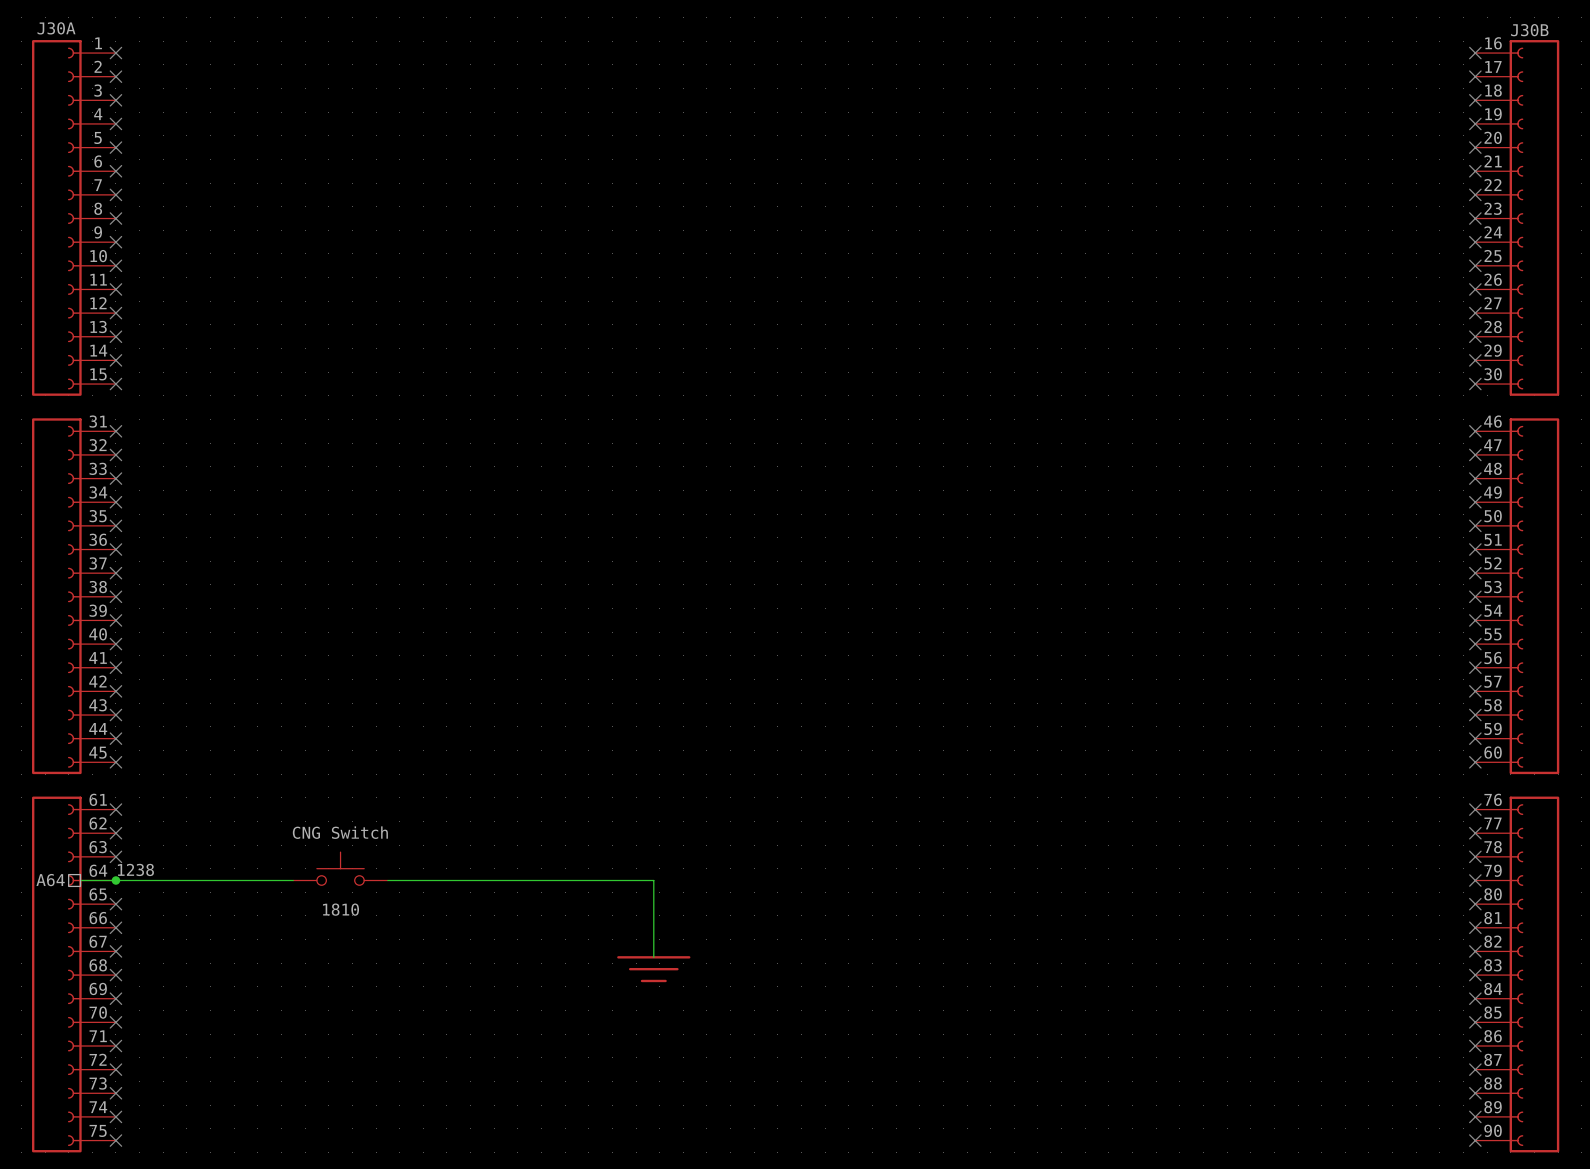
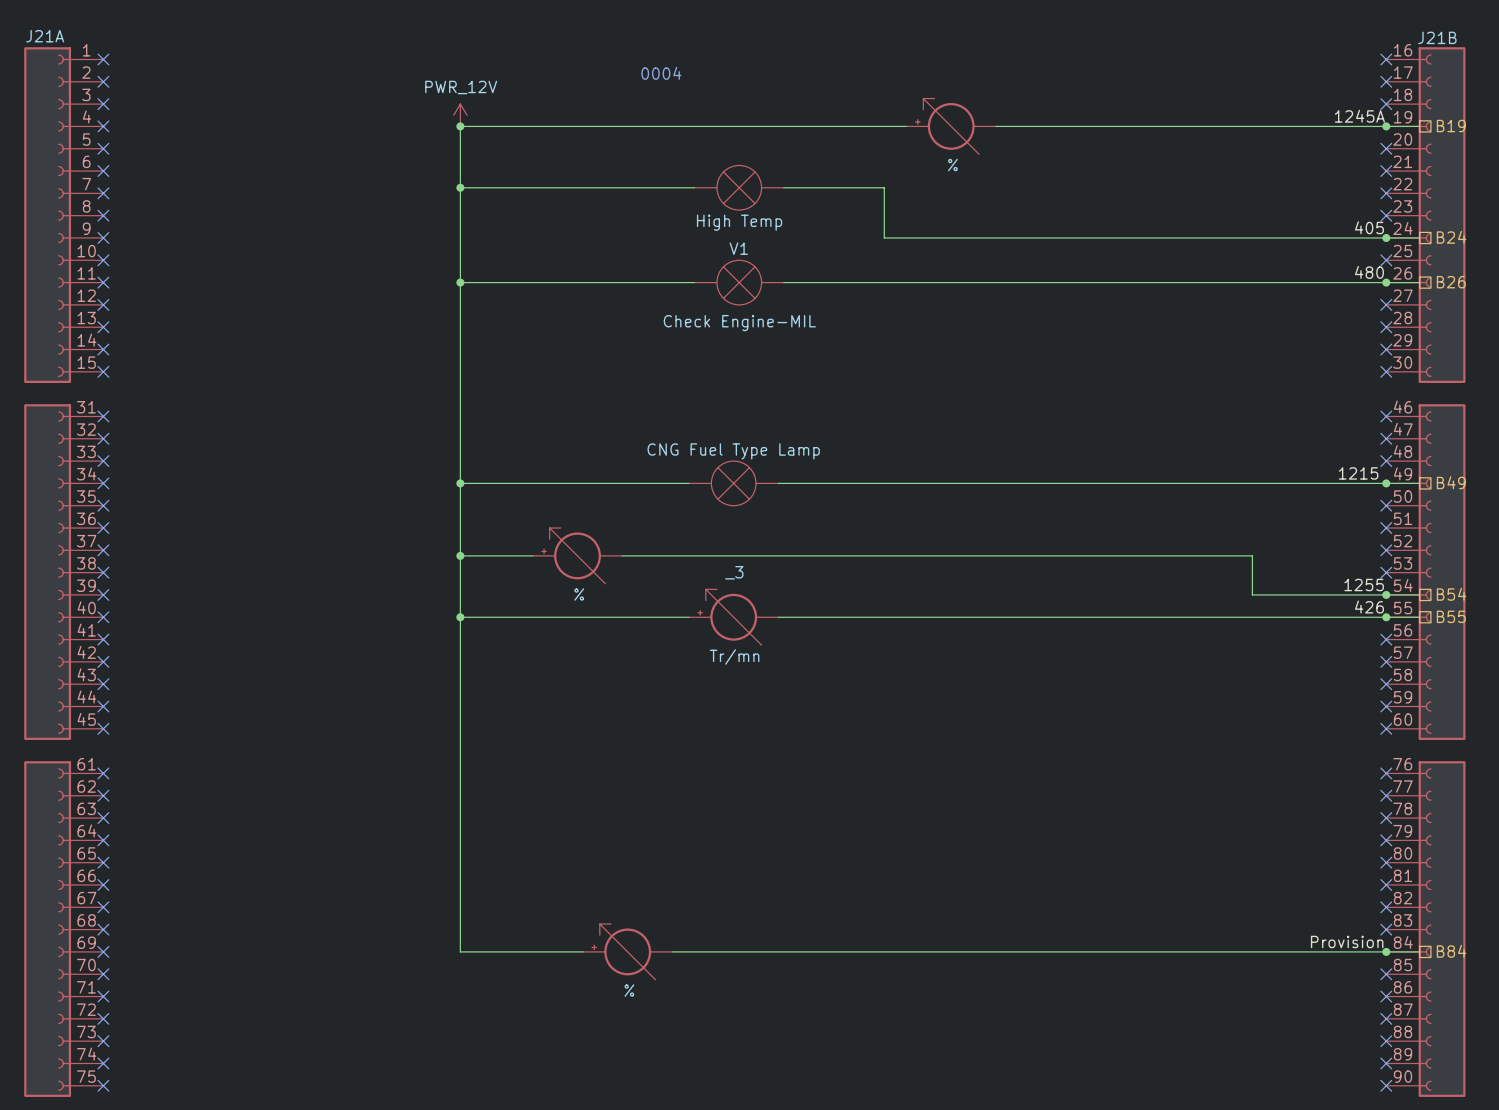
J30A name: J30A (56, 28) -> J21A (45, 36)
J30B name: J30B (1529, 30) -> J21B (1437, 37)
text: none -> 0004 (661, 73)
power symbol: none -> PWR_12V (460, 115)
label: none -> 1245A (1359, 116)
junction: none -> (460, 126)
wire: none -> (906, 126) (460, 126) (460, 951) (583, 951)
part: none -> % (951, 126)
wire: none -> (995, 126) (1419, 126)
junction: none -> (1386, 126)
no-connect mark: (1475, 123) -> none
hierarchical label: none -> B19 (1451, 126)
wire: none -> (460, 187) (694, 187)
junction: none -> (460, 187)
part: none -> High Temp (739, 187)
wire: none -> (783, 187) (884, 187) (884, 237) (1419, 237)
label: none -> 405 (1369, 227)
hierarchical label: none -> B24 (1451, 237)
junction: none -> (1386, 237)
no-connect mark: (1475, 242) -> none
label: none -> 480 (1369, 272)
wire: none -> (460, 282) (694, 282)
junction: none -> (460, 282)
V1: none -> Check Engine-MIL (739, 282)
wire: none -> (783, 282) (1419, 282)
junction: none -> (1386, 282)
no-connect mark: (1475, 289) -> none
hierarchical label: none -> B26 (1451, 282)
label: none -> 1215 (1358, 473)
hierarchical label: none -> B49 (1451, 482)
wire: none -> (460, 483) (689, 483)
junction: none -> (460, 483)
part: none -> CNG Fuel Type Lamp (733, 483)
wire: none -> (778, 483) (1419, 483)
junction: none -> (1386, 483)
no-connect mark: (1475, 502) -> none
wire: none -> (460, 555) (532, 555)
junction: none -> (460, 555)
part: none -> % (577, 555)
wire: none -> (622, 555) (1252, 555) (1252, 594) (1419, 594)
label: none -> 1255 (1364, 585)
junction: none -> (1386, 594)
no-connect mark: (1475, 620) -> none
hierarchical label: none -> B54 (1451, 594)
label: none -> 426 (1369, 607)
hierarchical label: none -> B55 (1451, 616)
wire: none -> (460, 617) (689, 617)
junction: none -> (460, 617)
_3: none -> Tr/mn (733, 617)
wire: none -> (778, 617) (1419, 617)
junction: none -> (1386, 617)
no-connect mark: (1475, 644) -> none
part: CNG Switch (340, 868) -> none
label: 1238 (135, 869) -> none
hierarchical label: A64 (50, 880) -> none
wire: (80, 880) (293, 880) -> none
junction: (115, 880) -> none
no-connect mark: none -> (103, 840)
wire: (387, 880) (653, 880) (653, 957) -> none
power symbol: (653, 969) -> none
label: none -> Provision (1347, 941)
part: none -> % (627, 951)
wire: none -> (672, 951) (1419, 951)
junction: none -> (1386, 951)
no-connect mark: (1475, 998) -> none
hierarchical label: none -> B84 (1451, 951)

